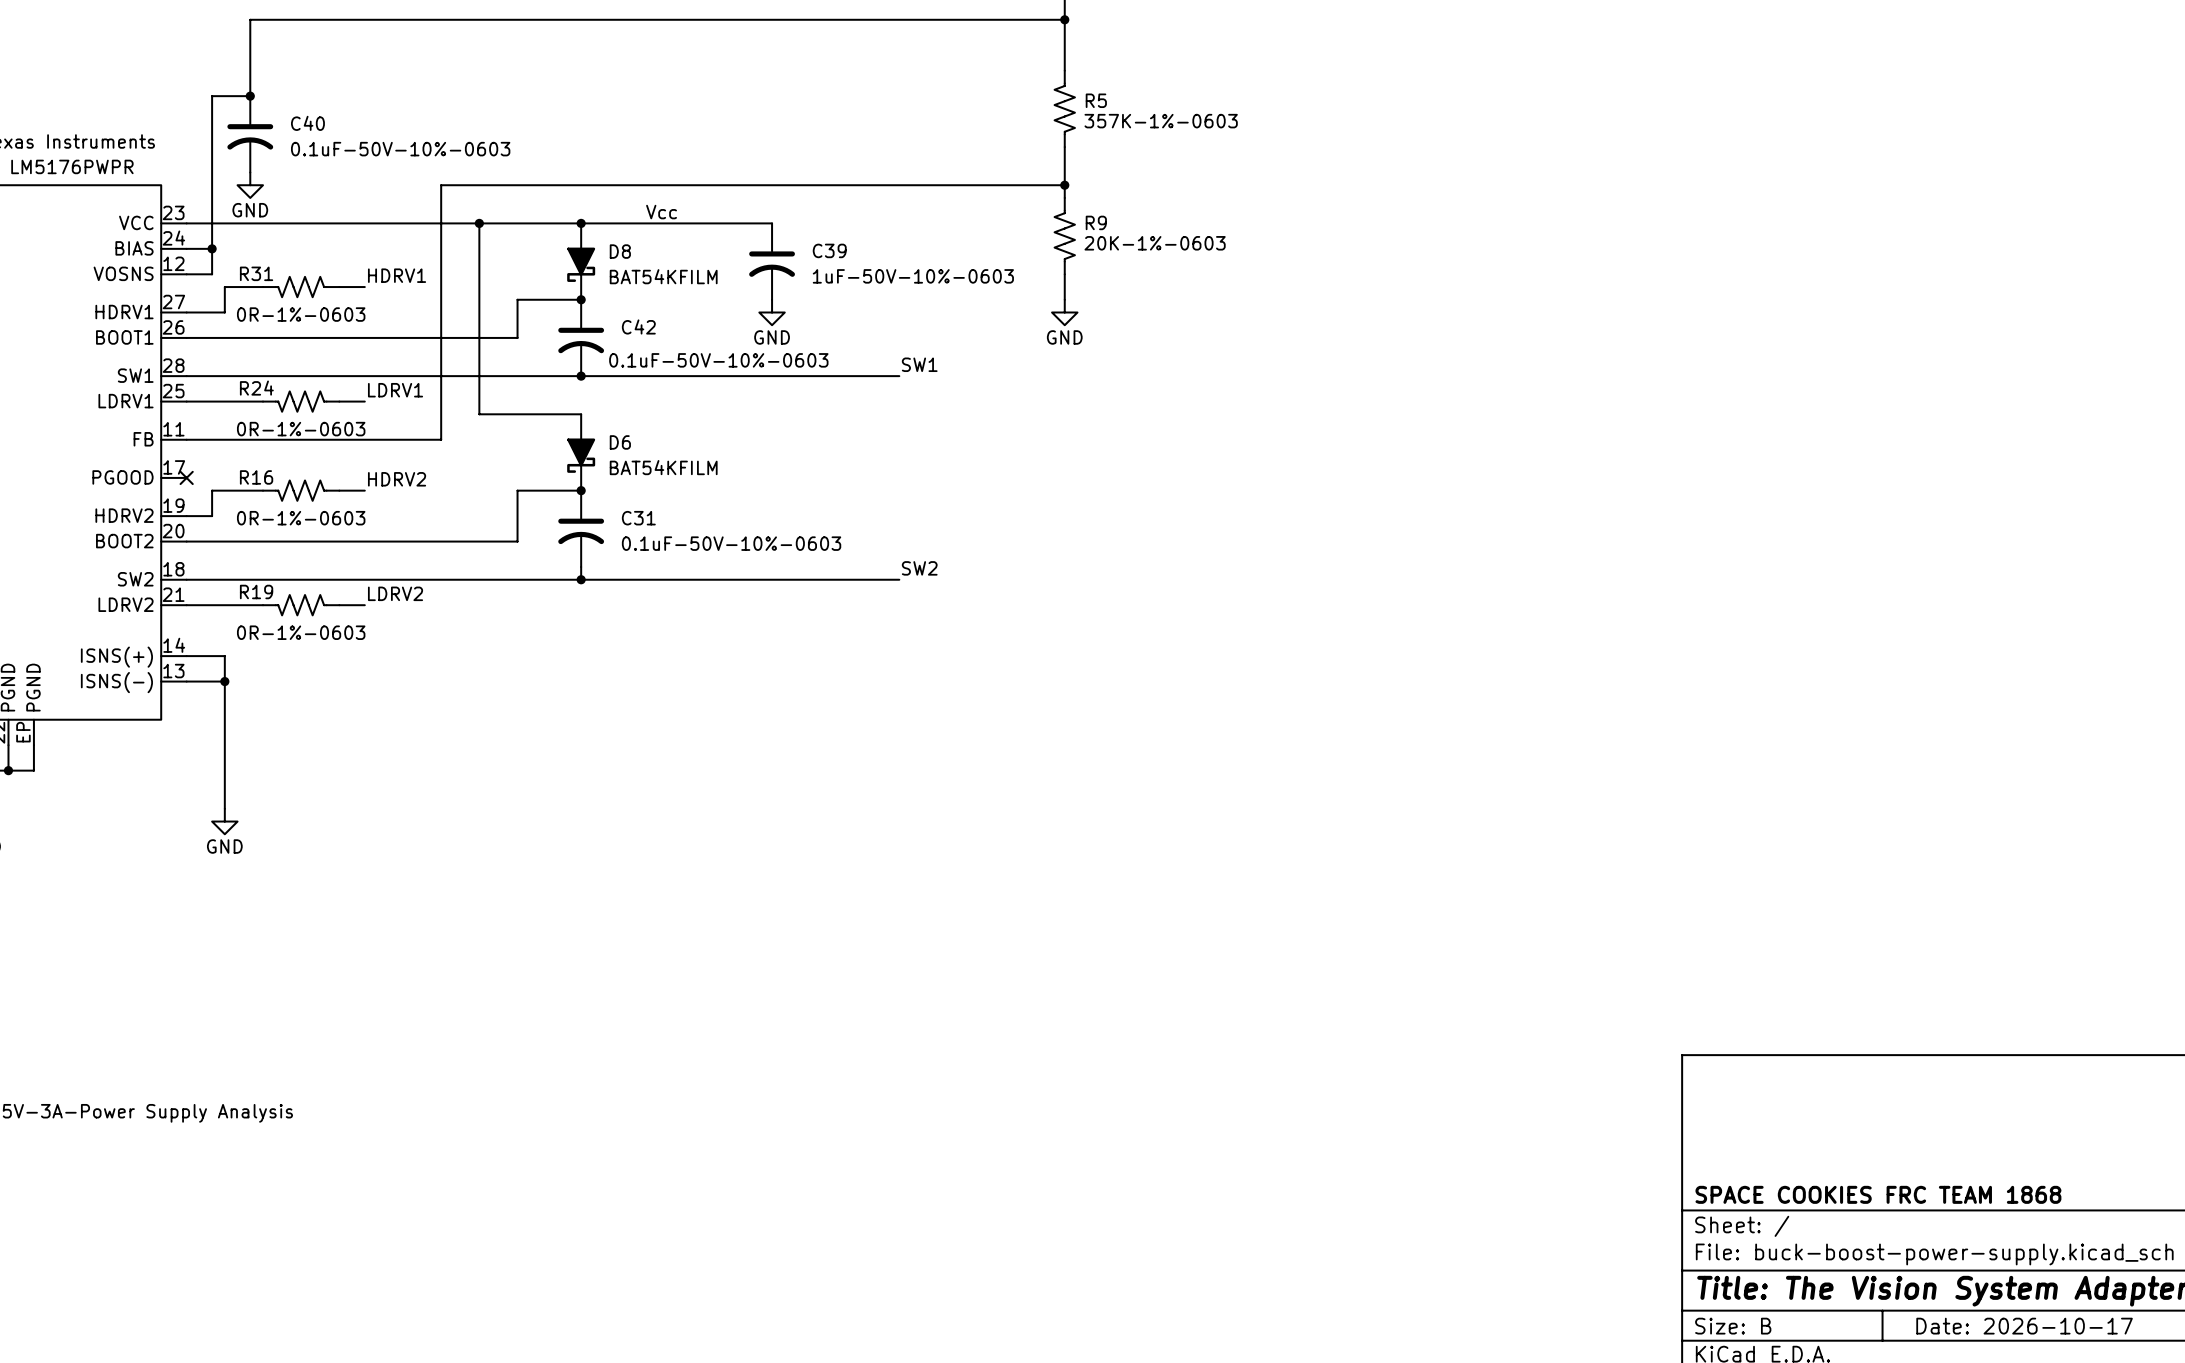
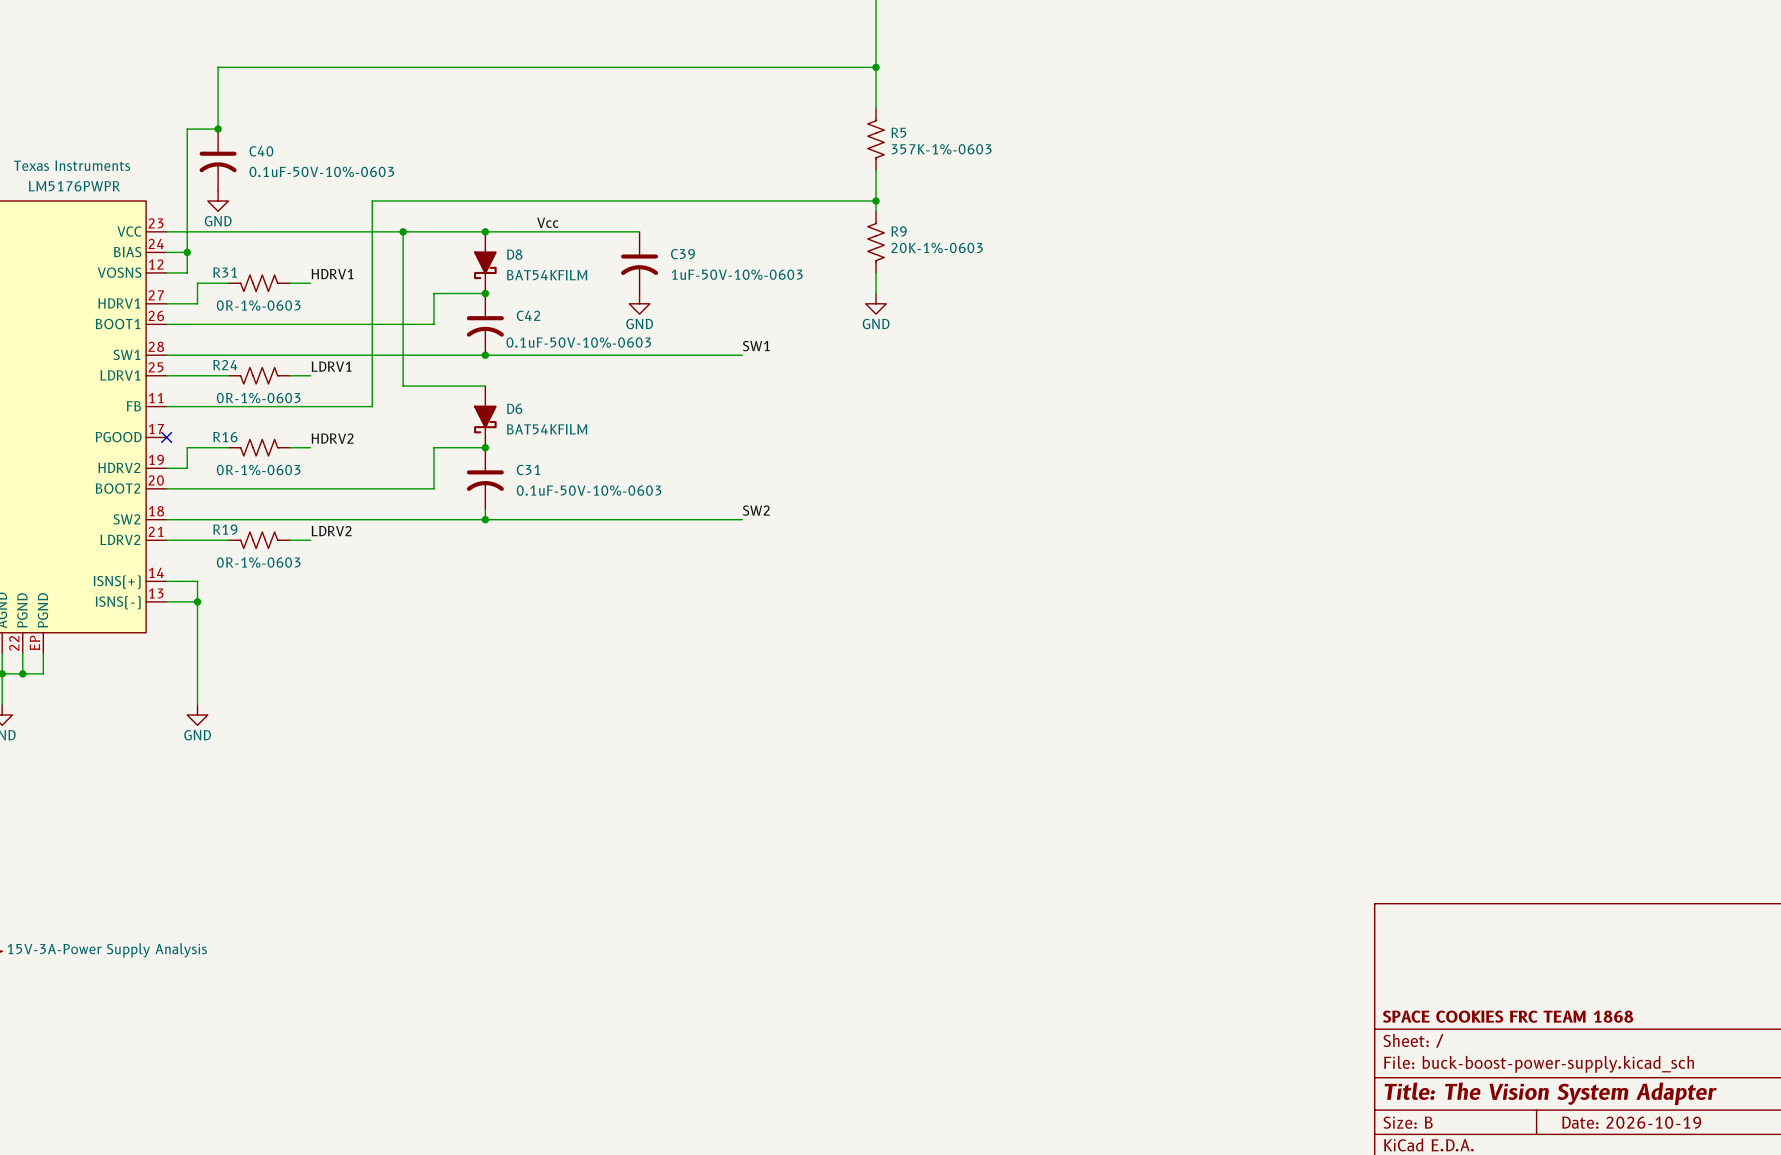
title block: Date: 2026-10-17 (2024, 1326) -> Date: 2026-10-19 (1631, 1122)

